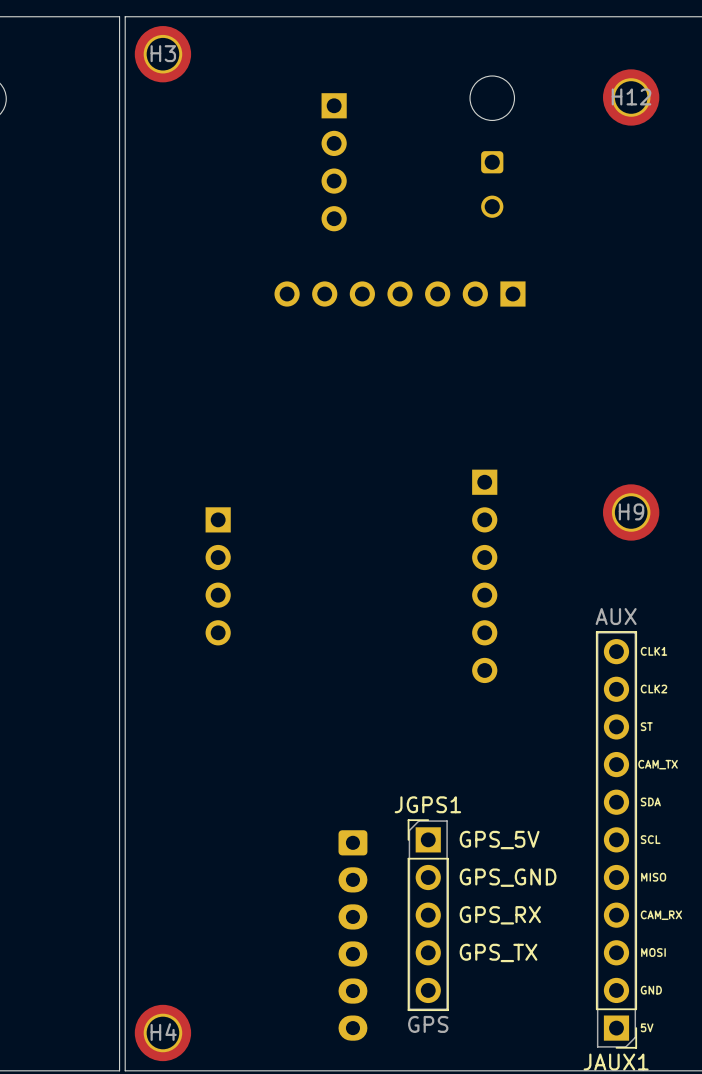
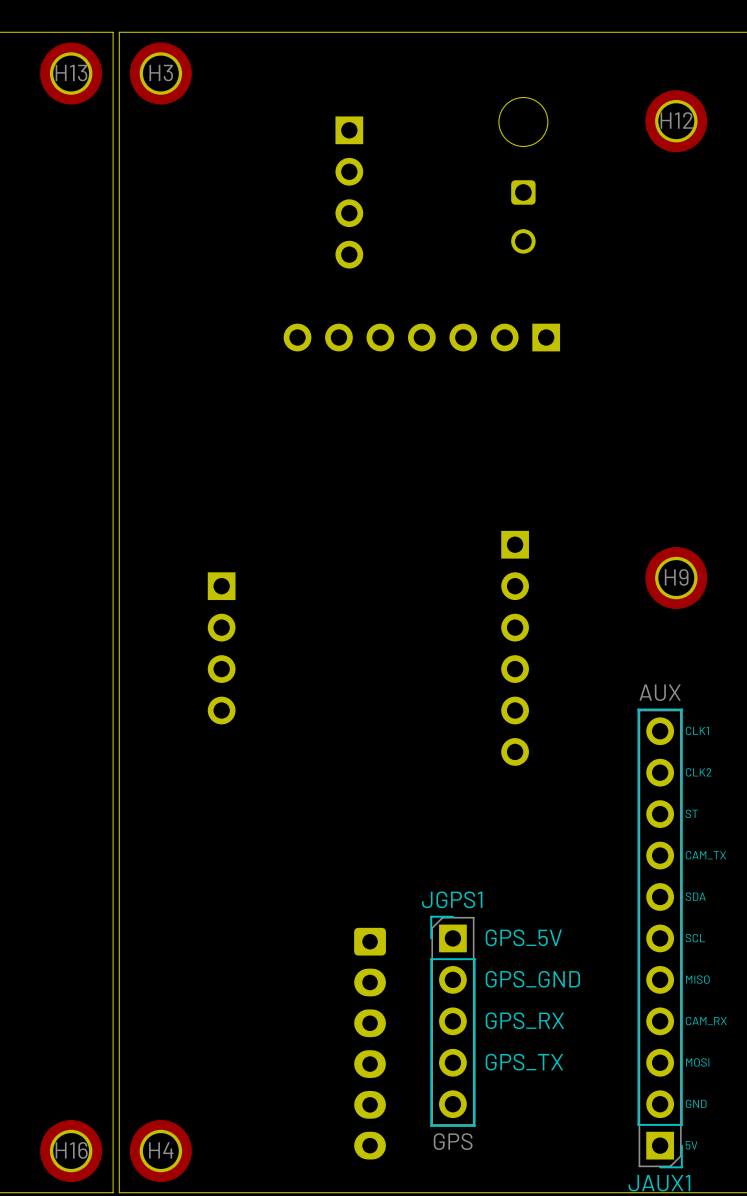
H13: none -> (71, 73)
H16: none -> (71, 1151)

